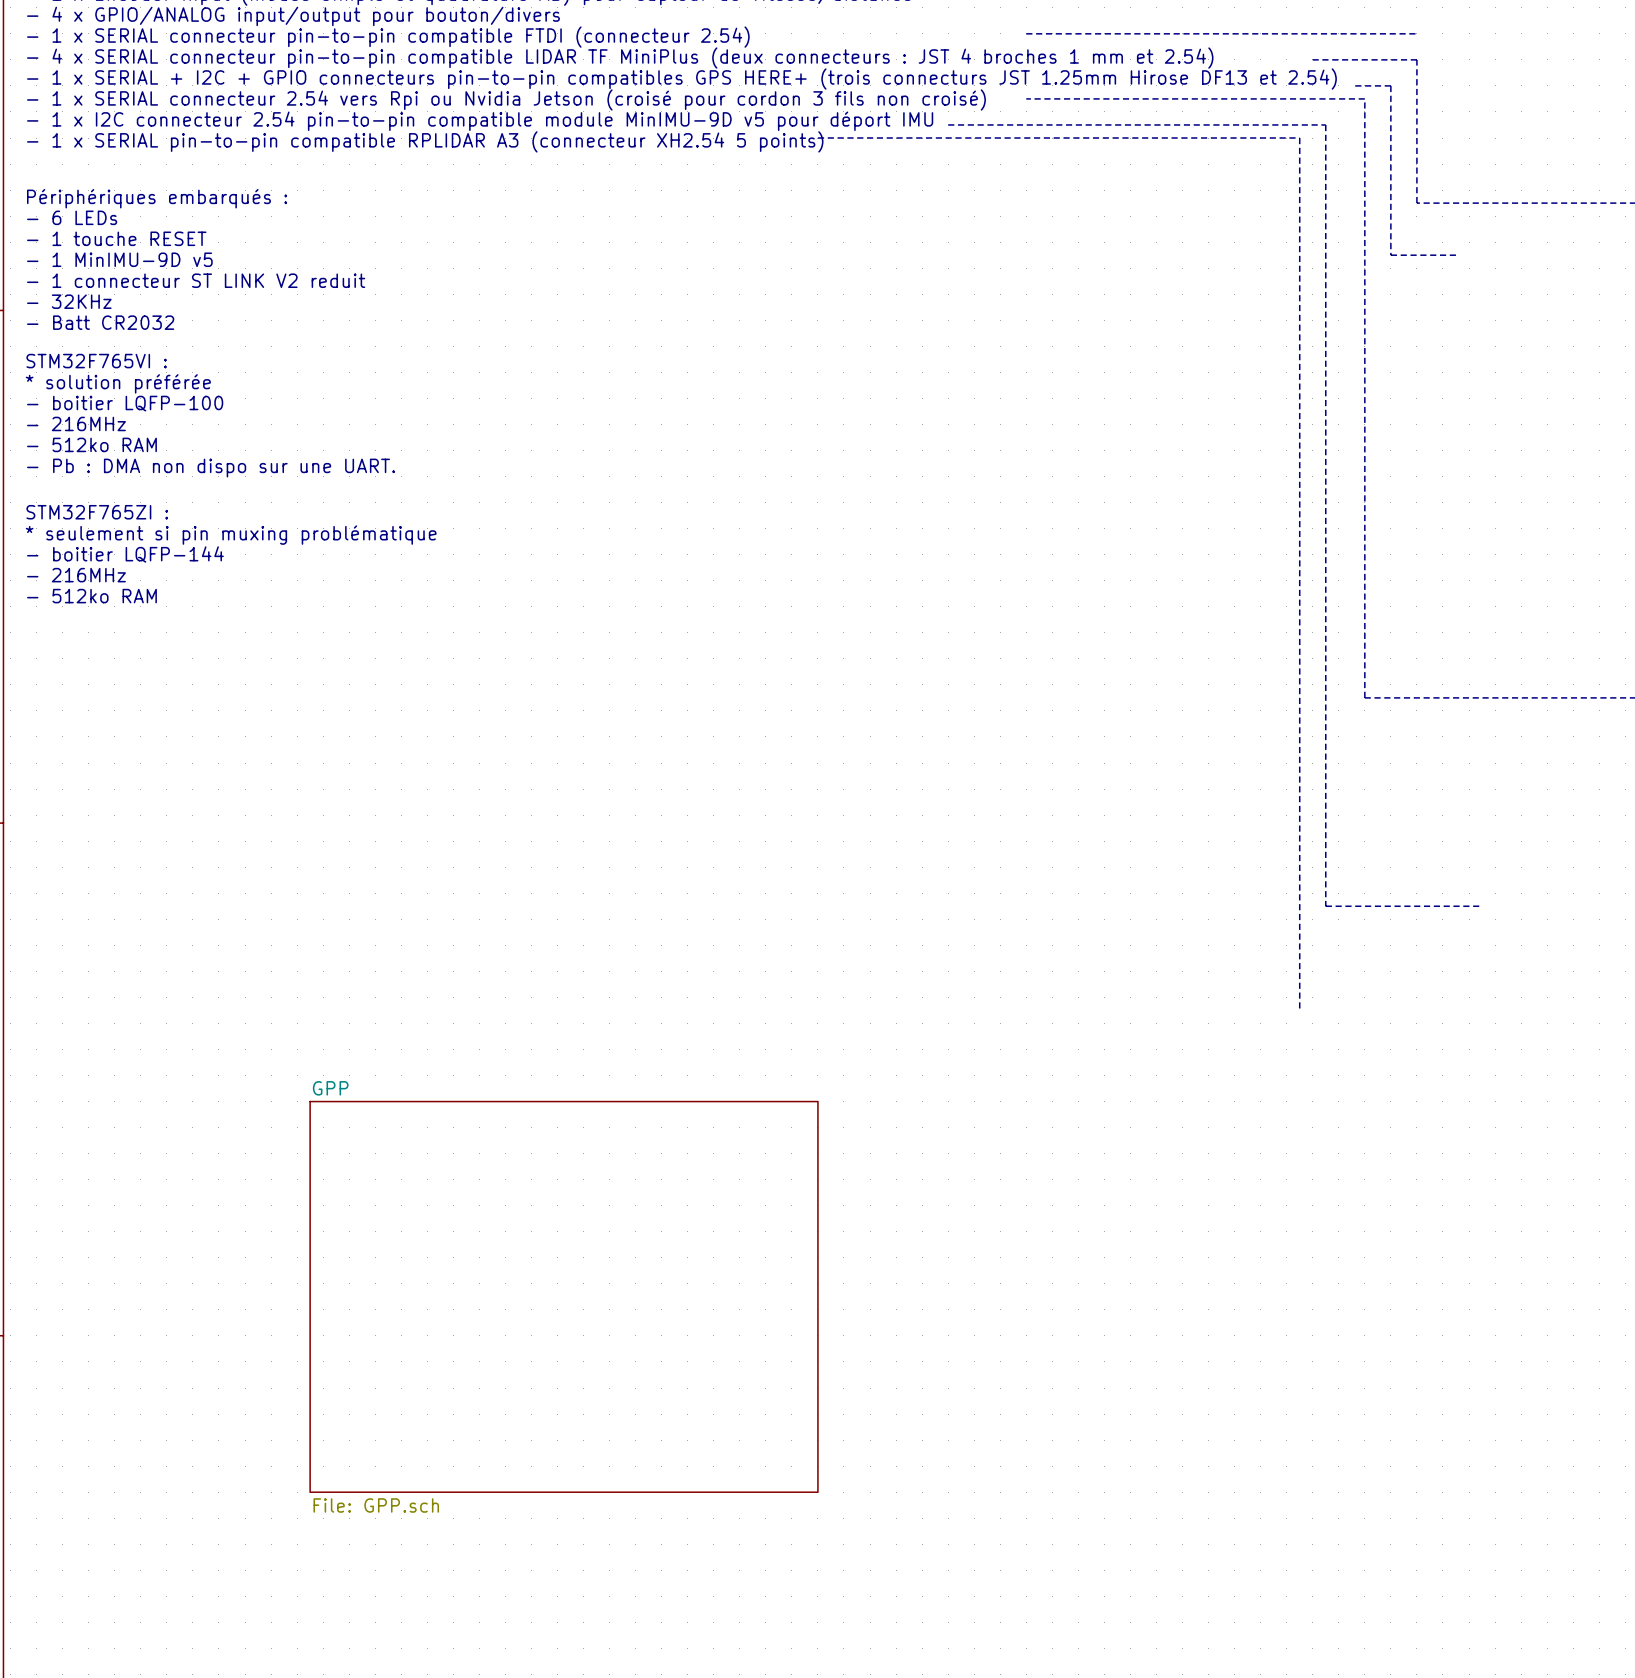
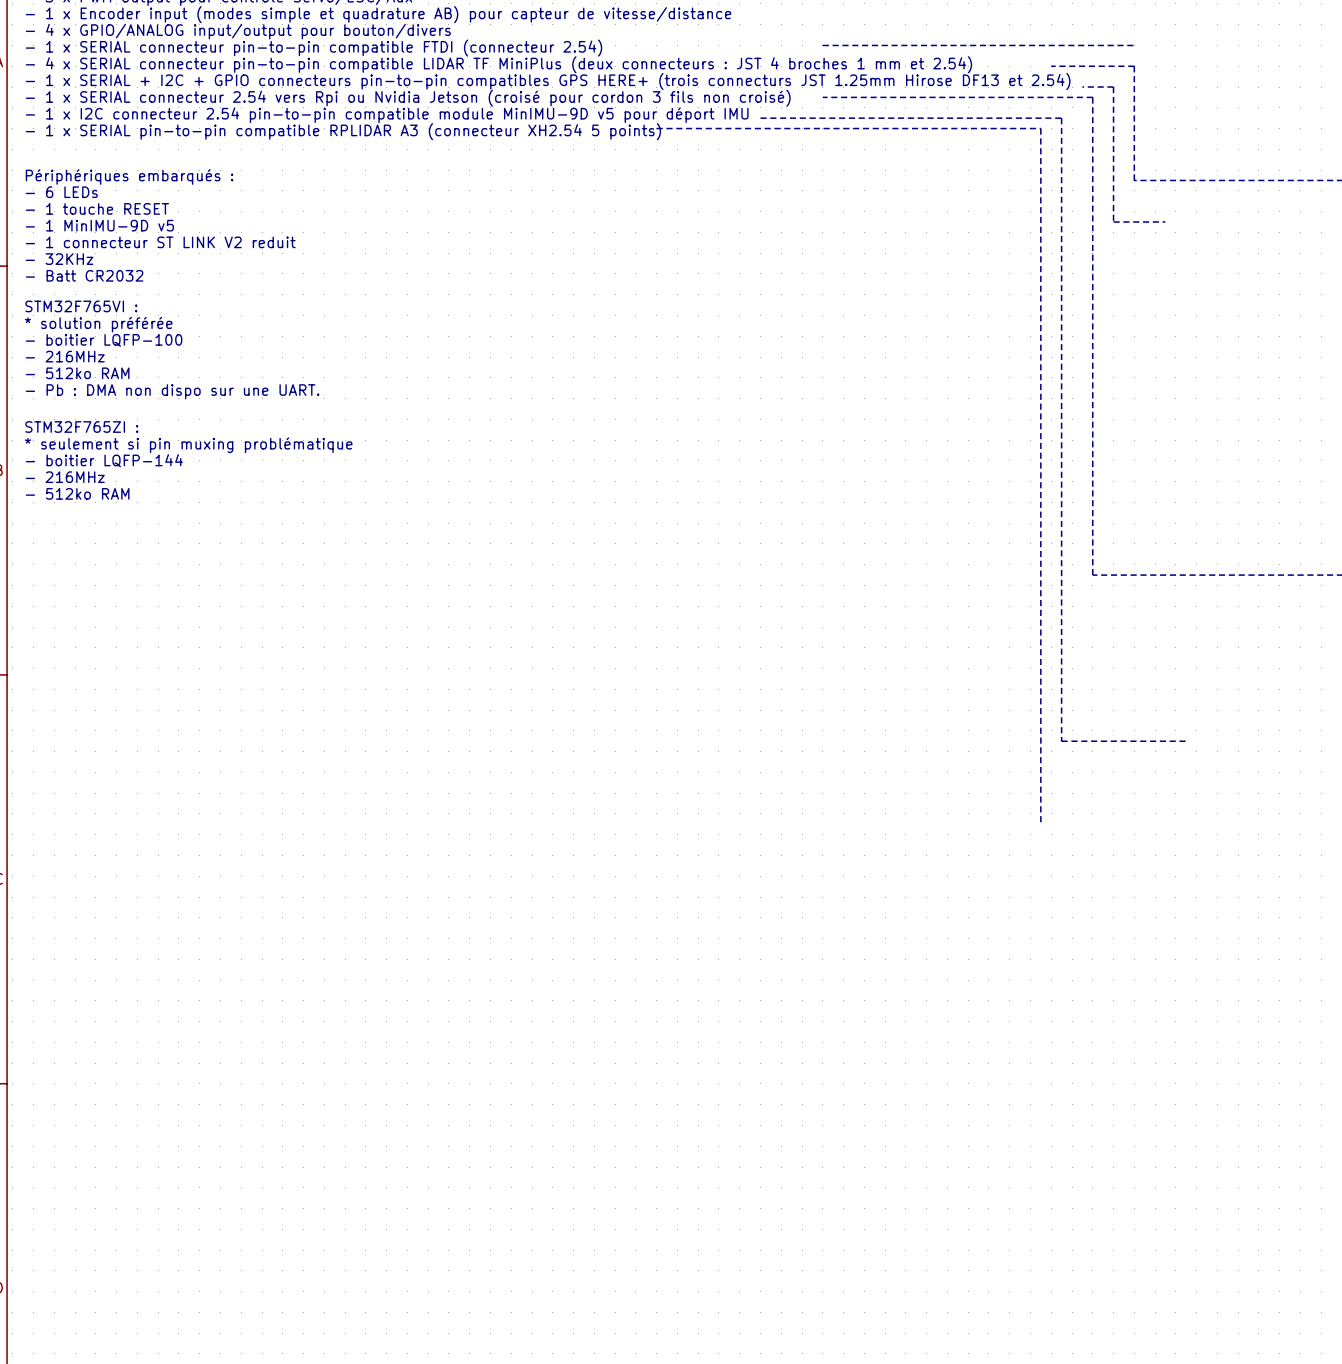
sheet GPP: File: GPP.sch (564, 1296) -> none

